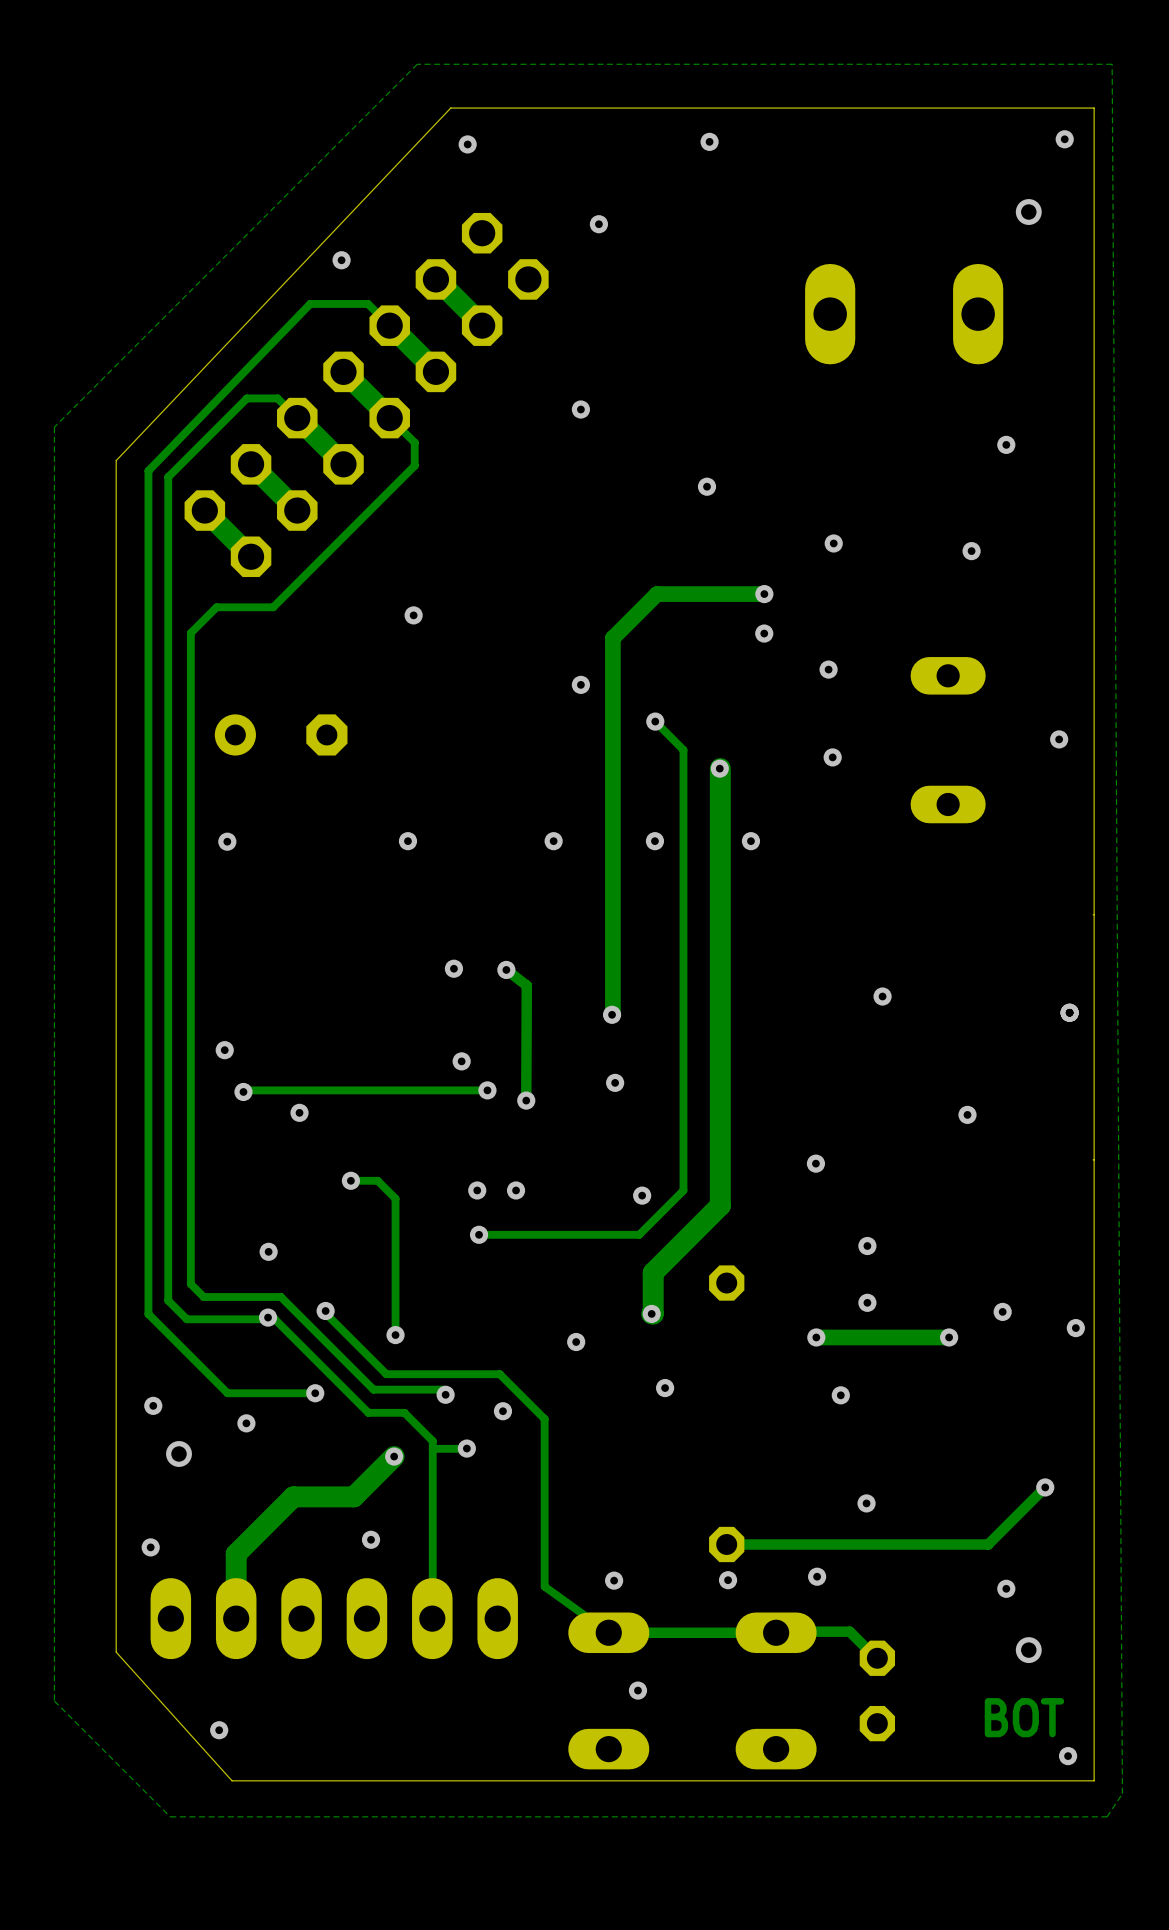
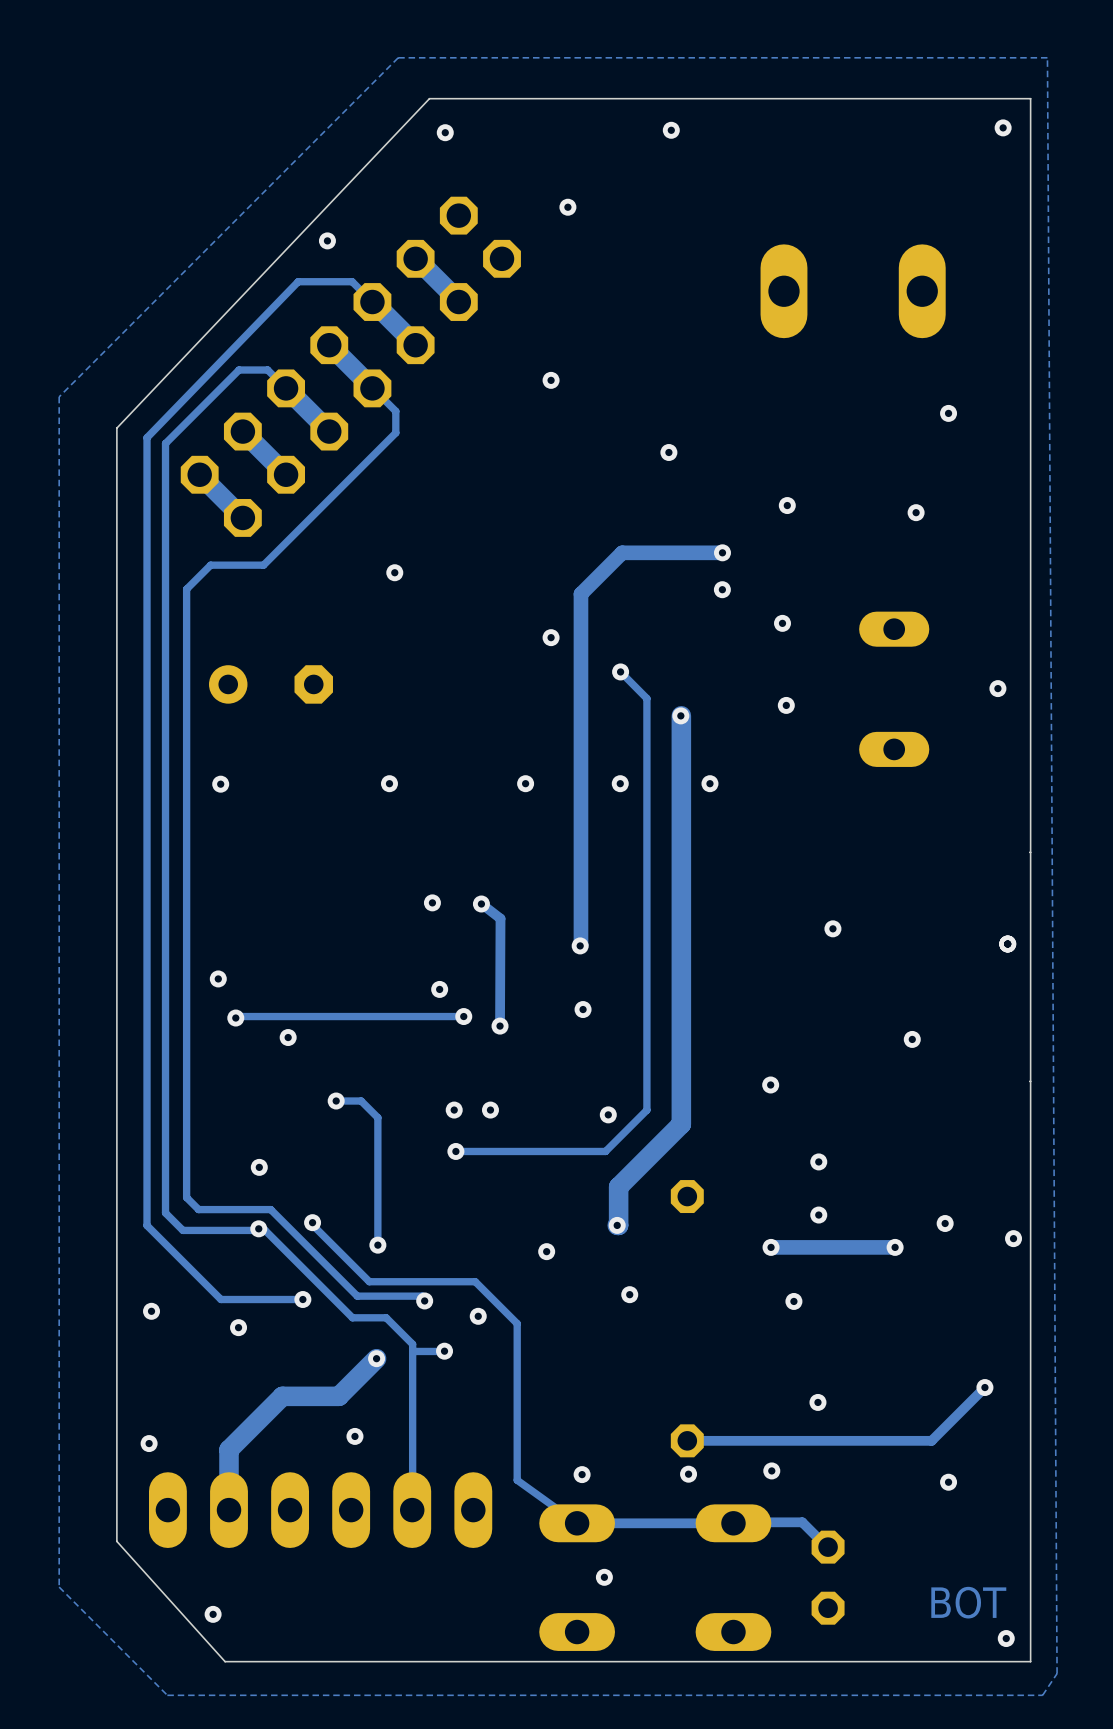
via: (1028, 212) -> none
via: (179, 1453) -> none
via: (1028, 1650) -> none

